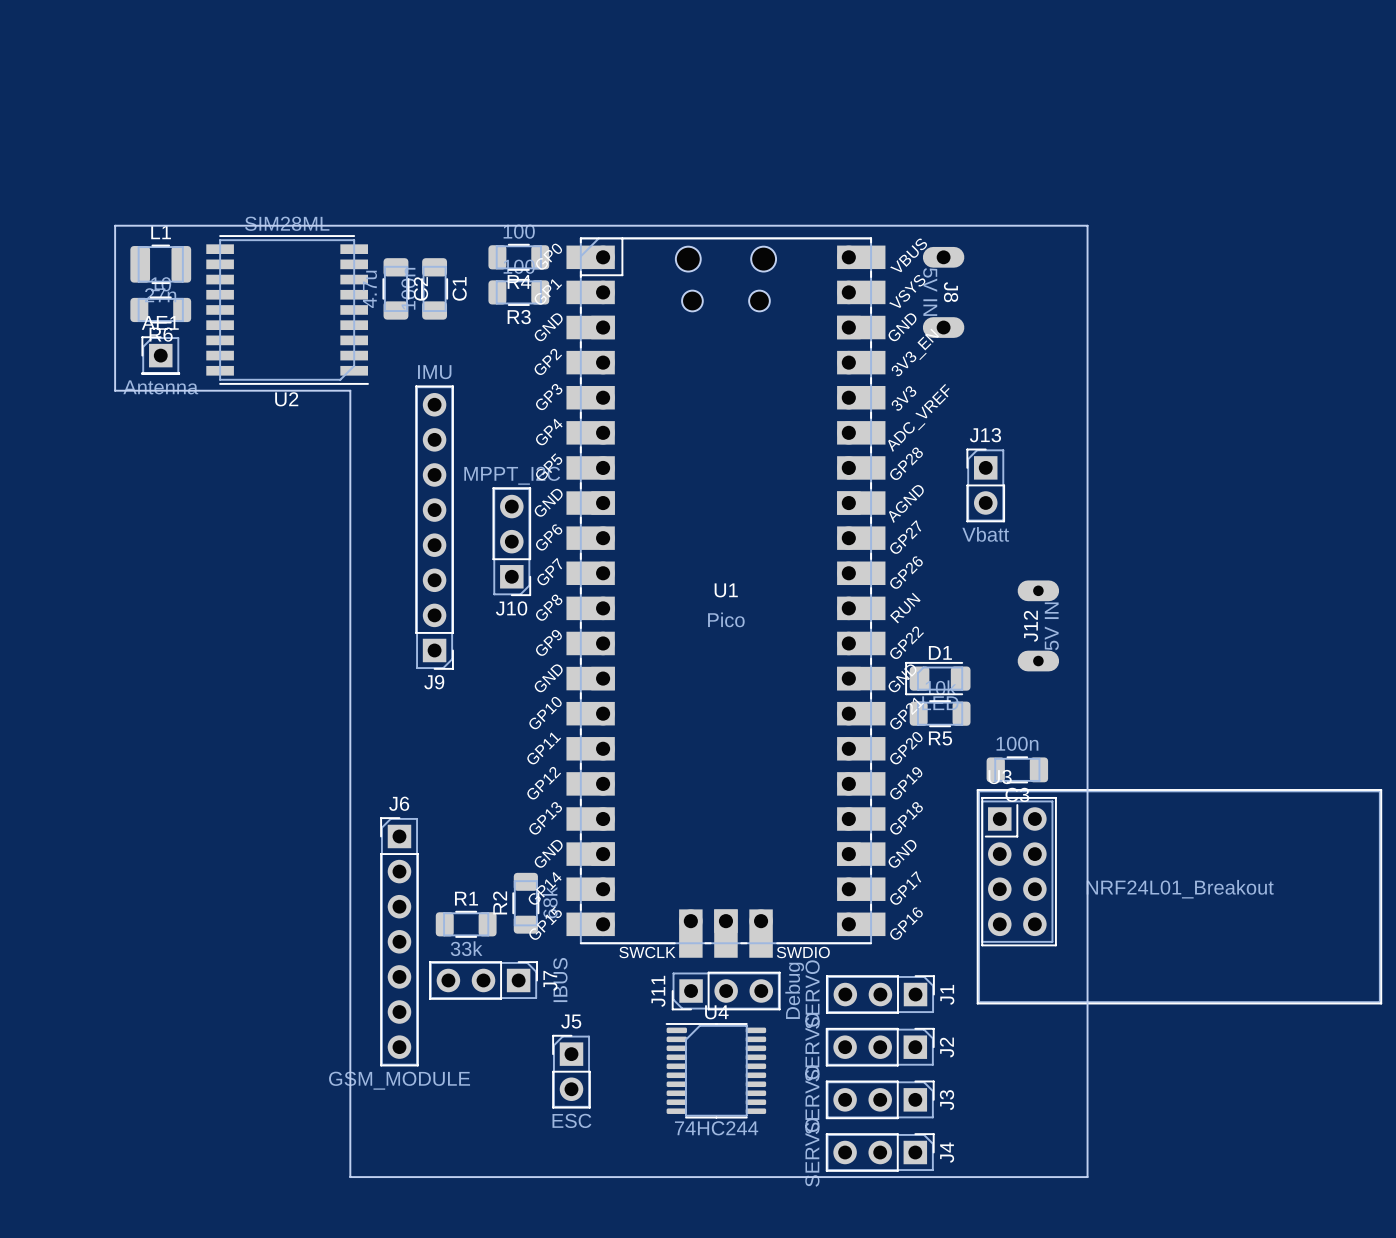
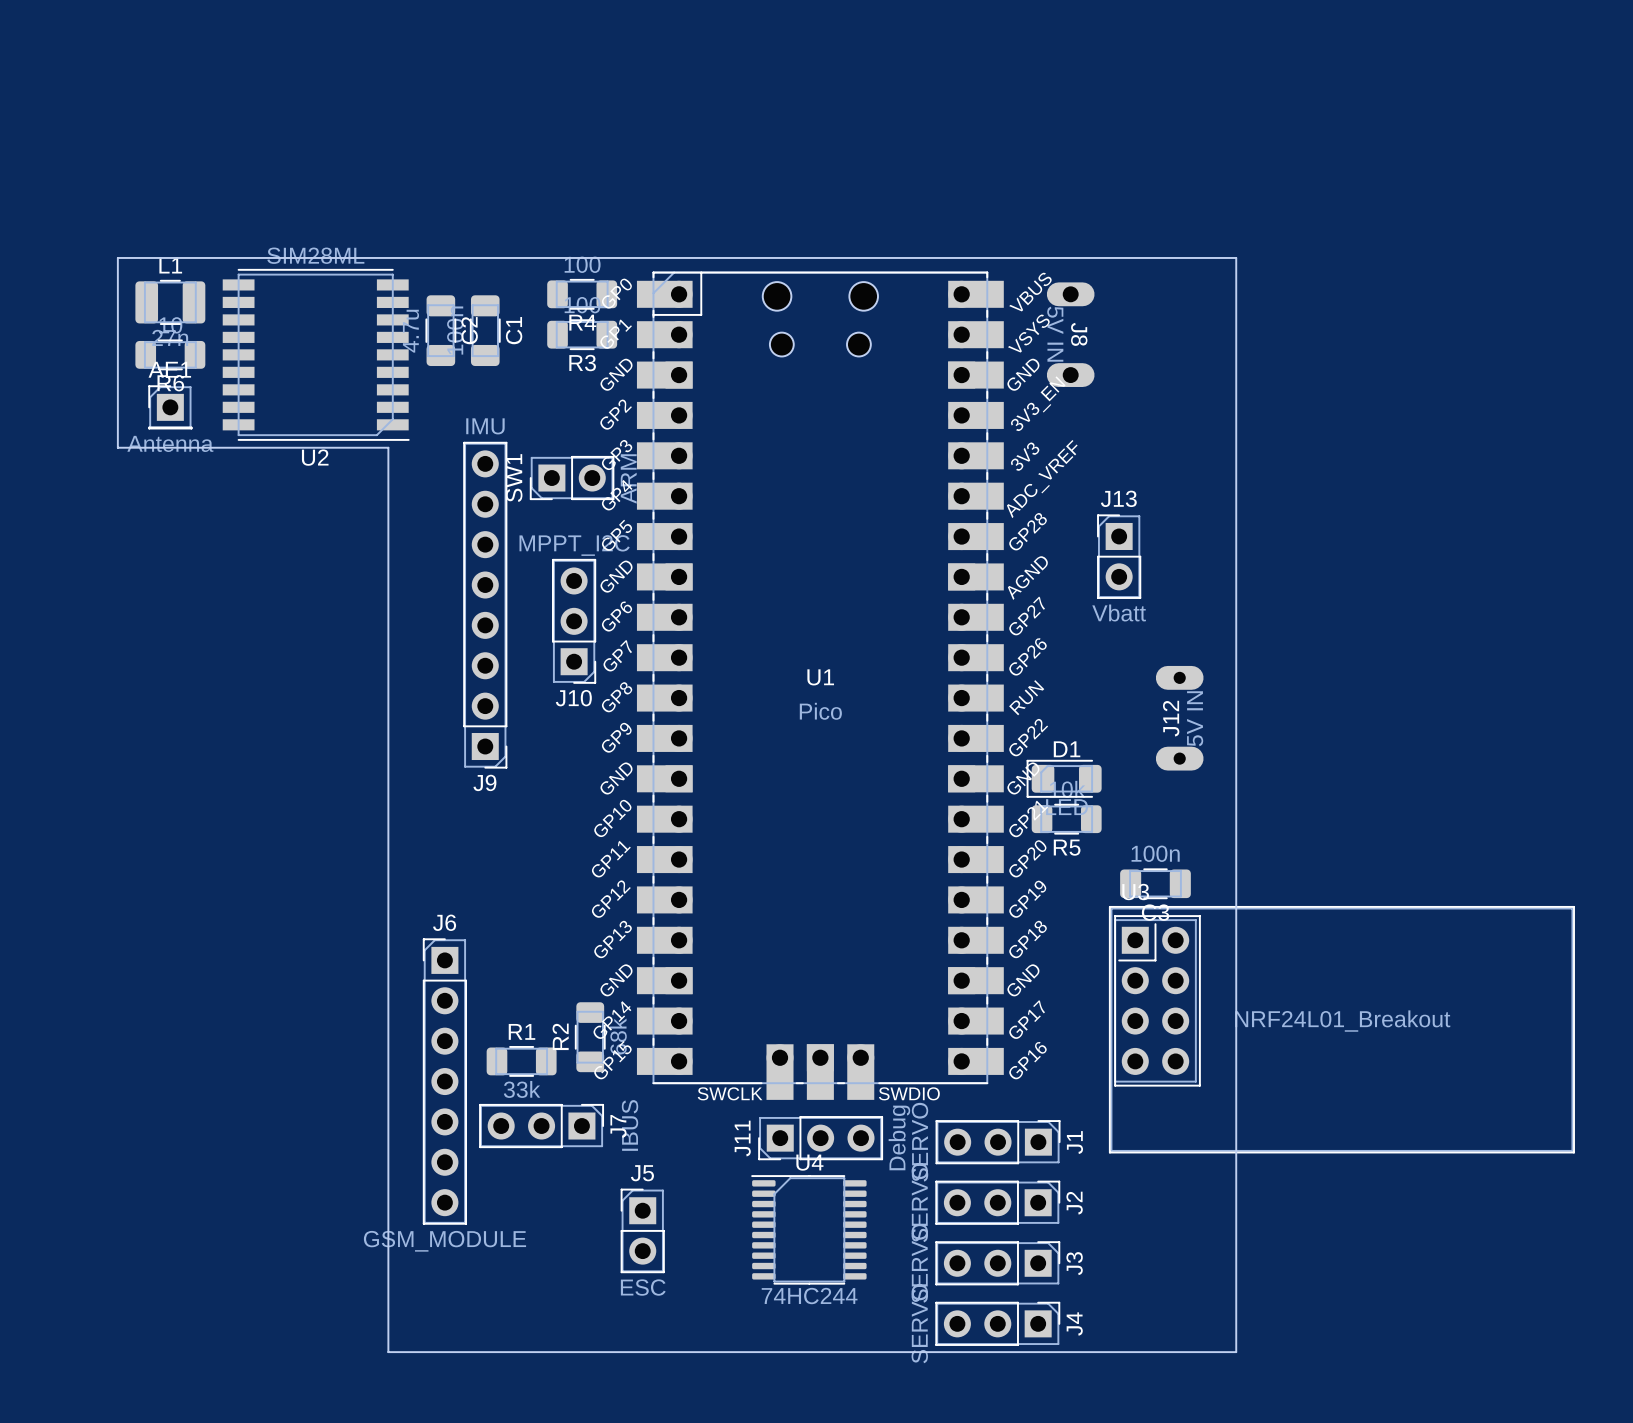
SW1: none -> ARM (572, 478)

